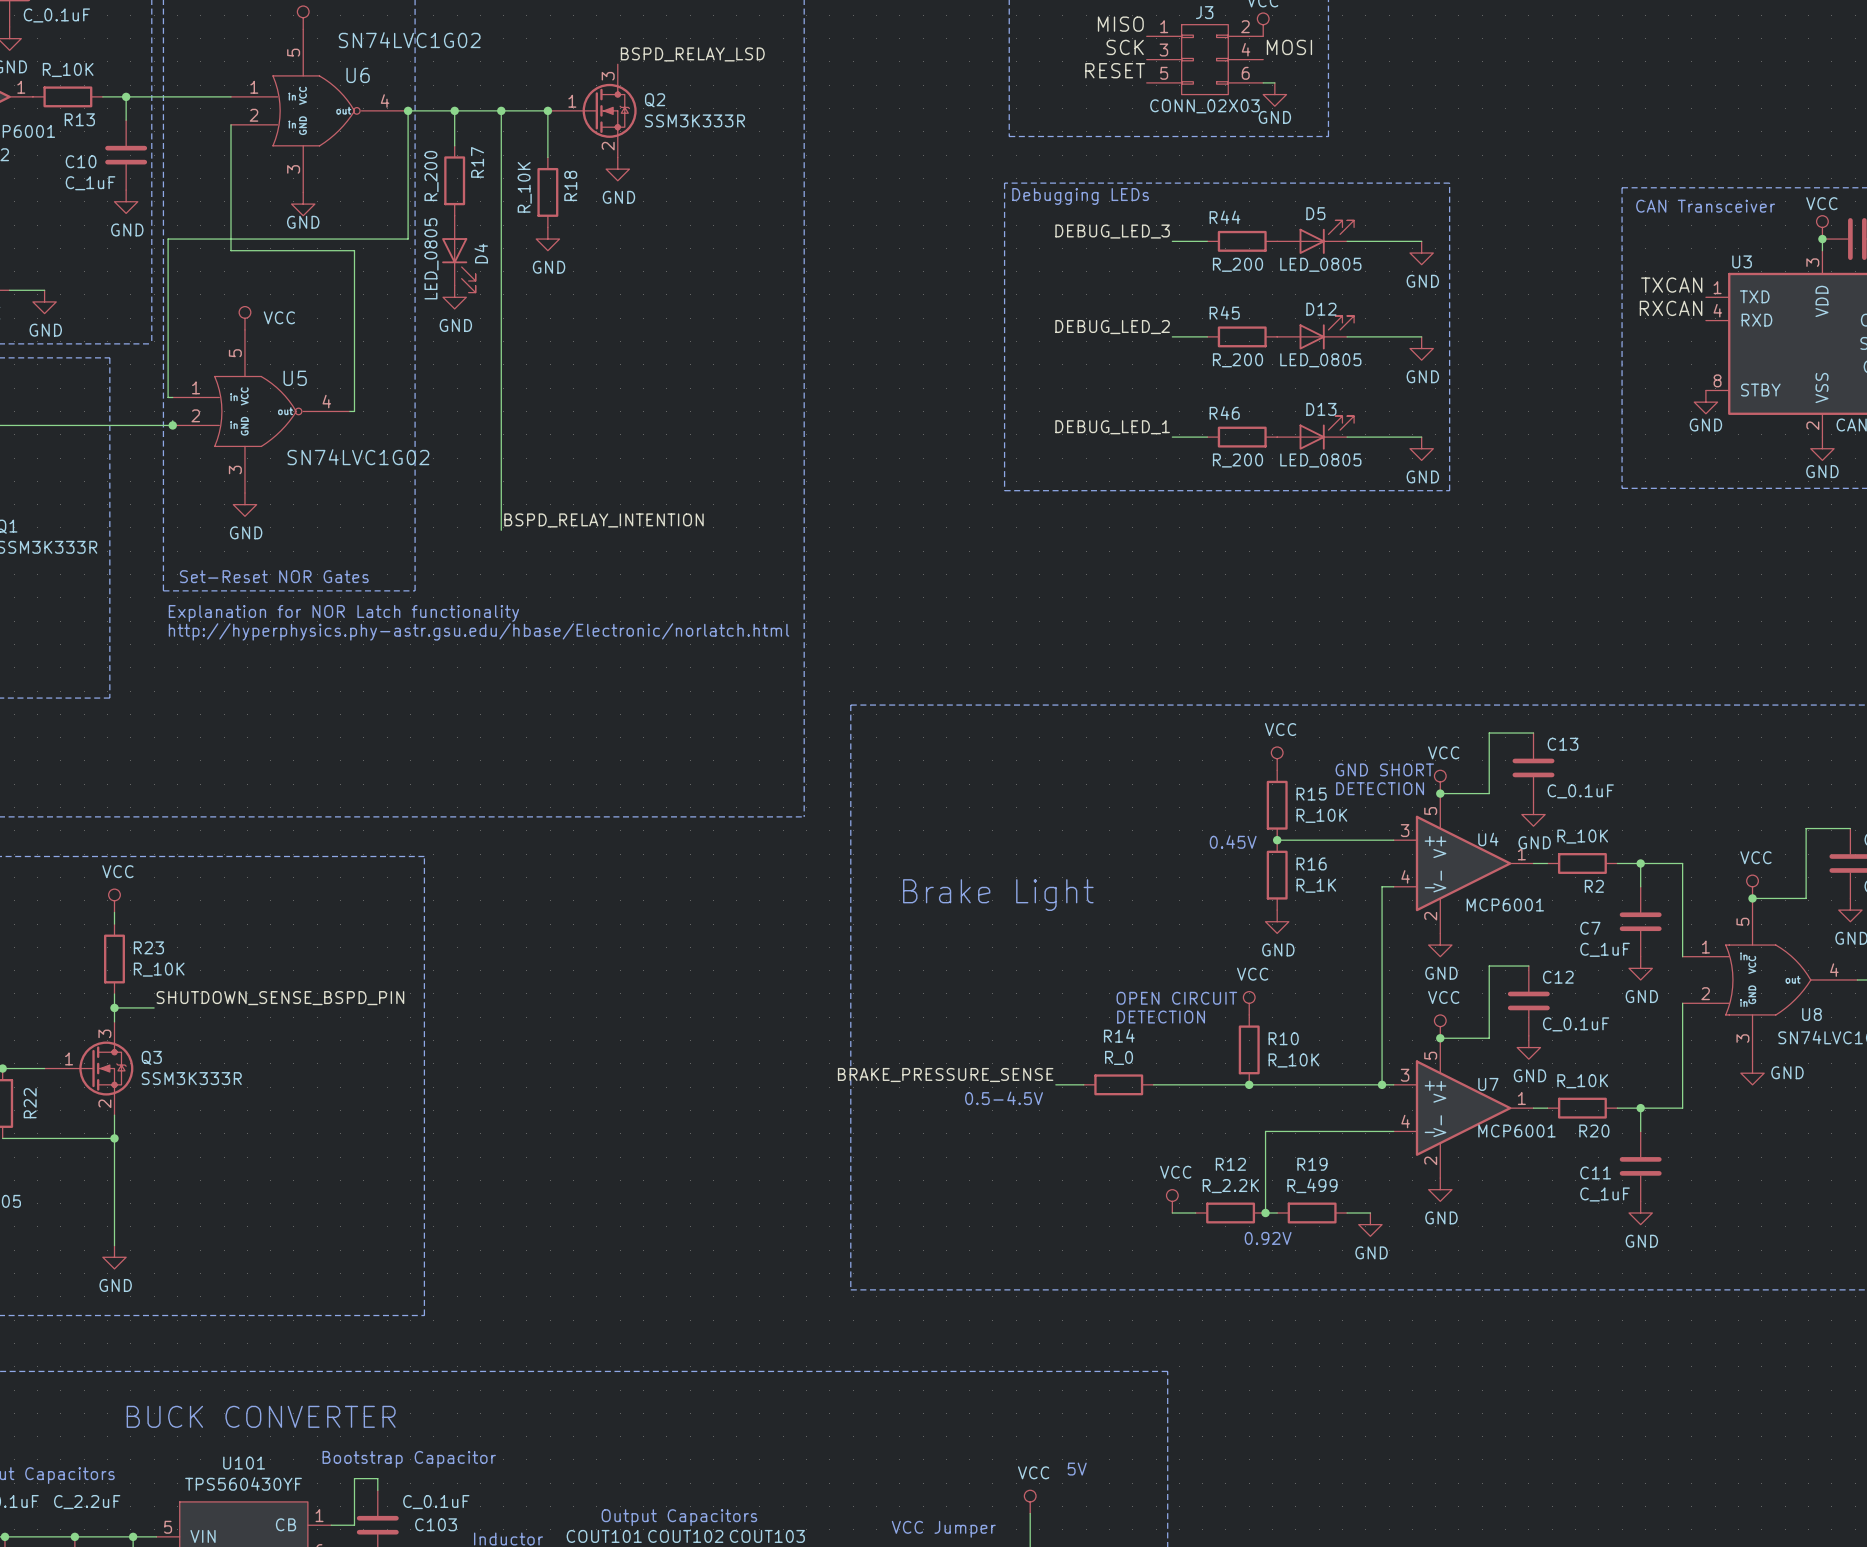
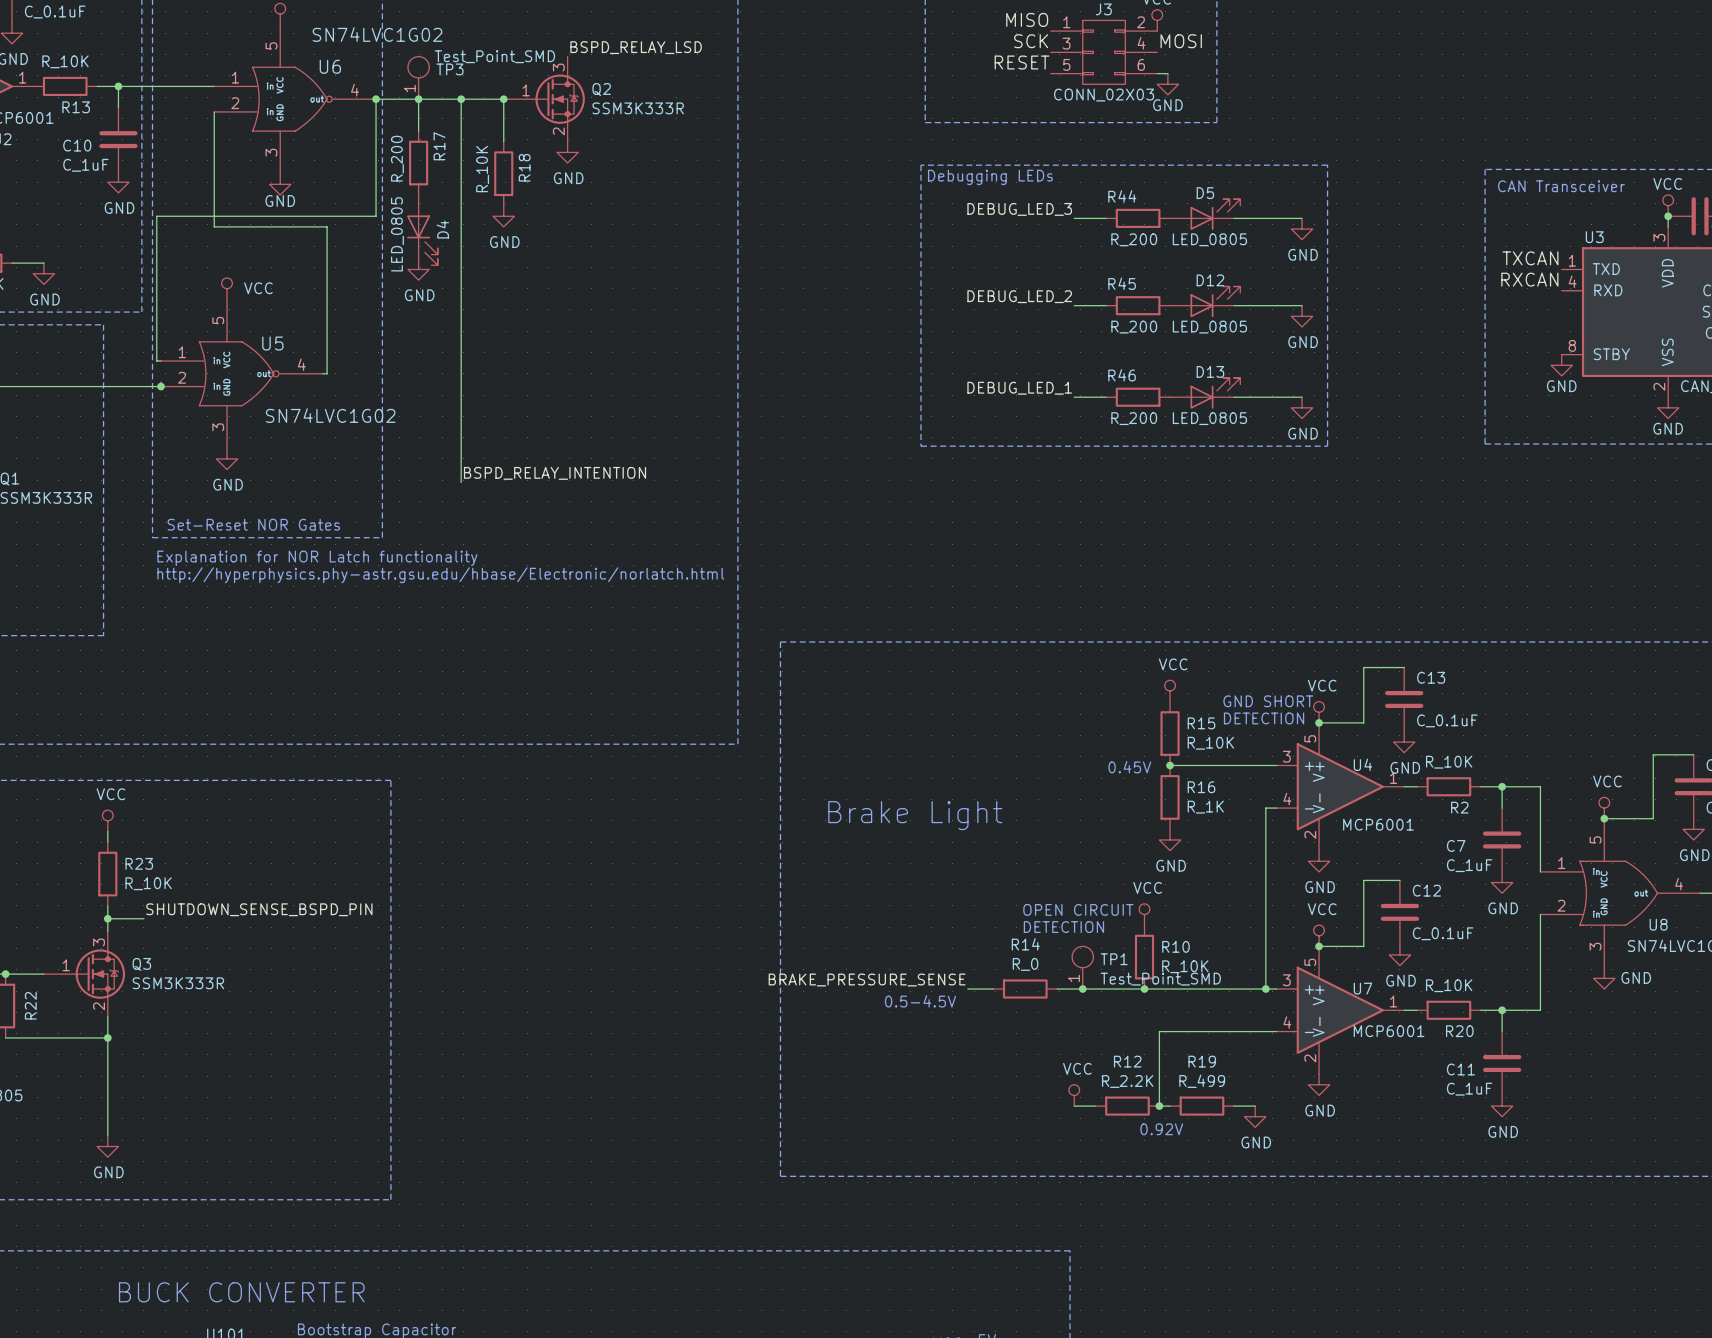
TP3: none -> Test_Point_SMD (418, 77)
TP1: none -> Test_Point_SMD (1082, 967)
junction: none -> (1082, 989)

